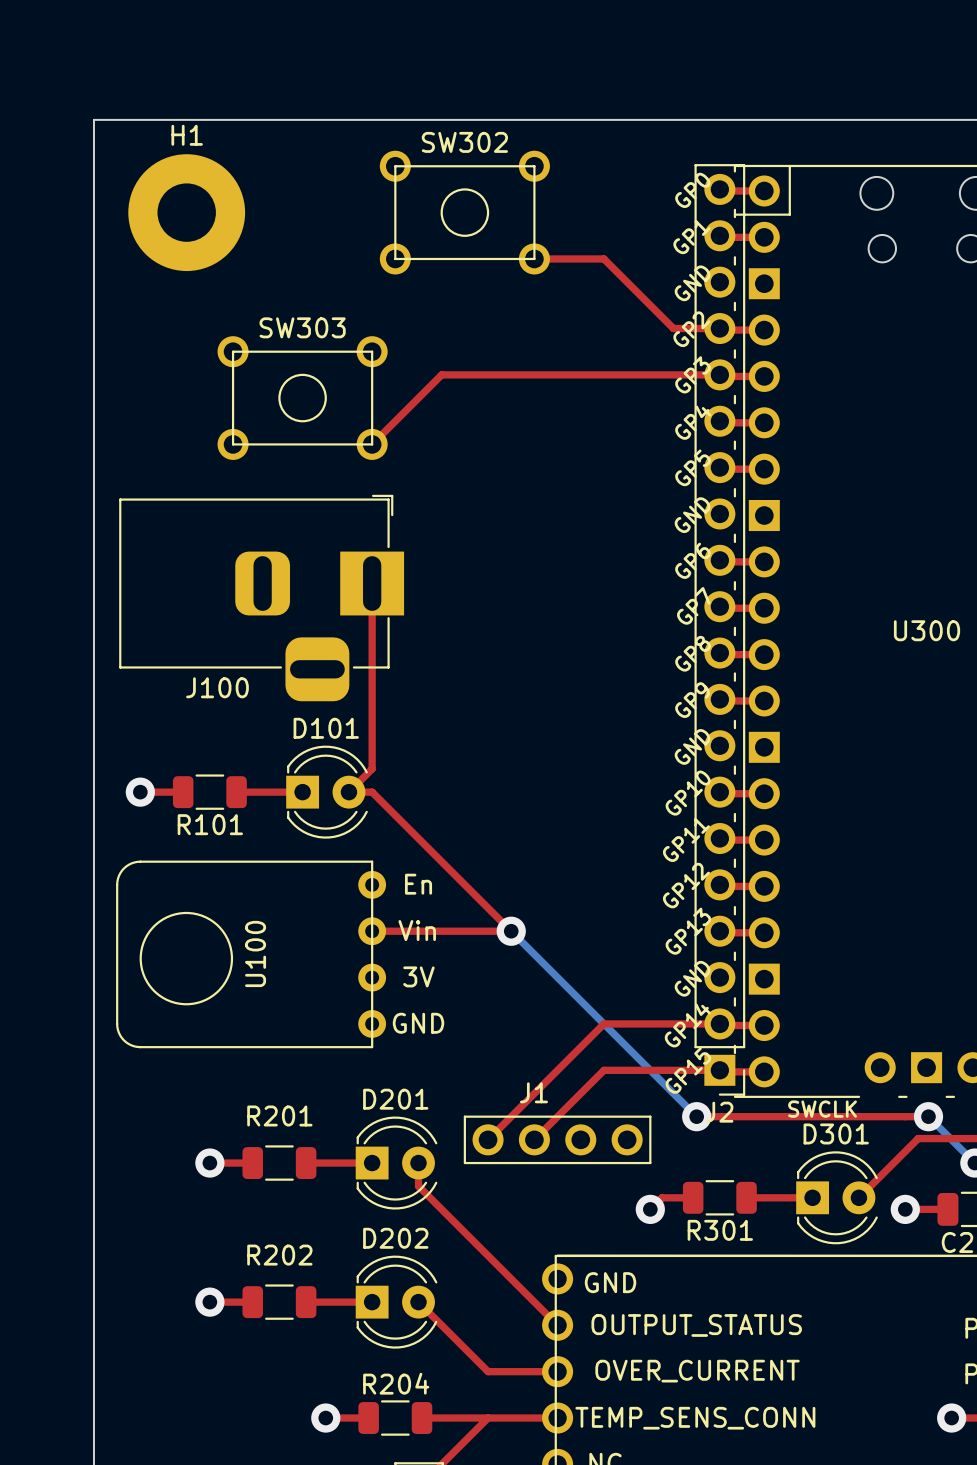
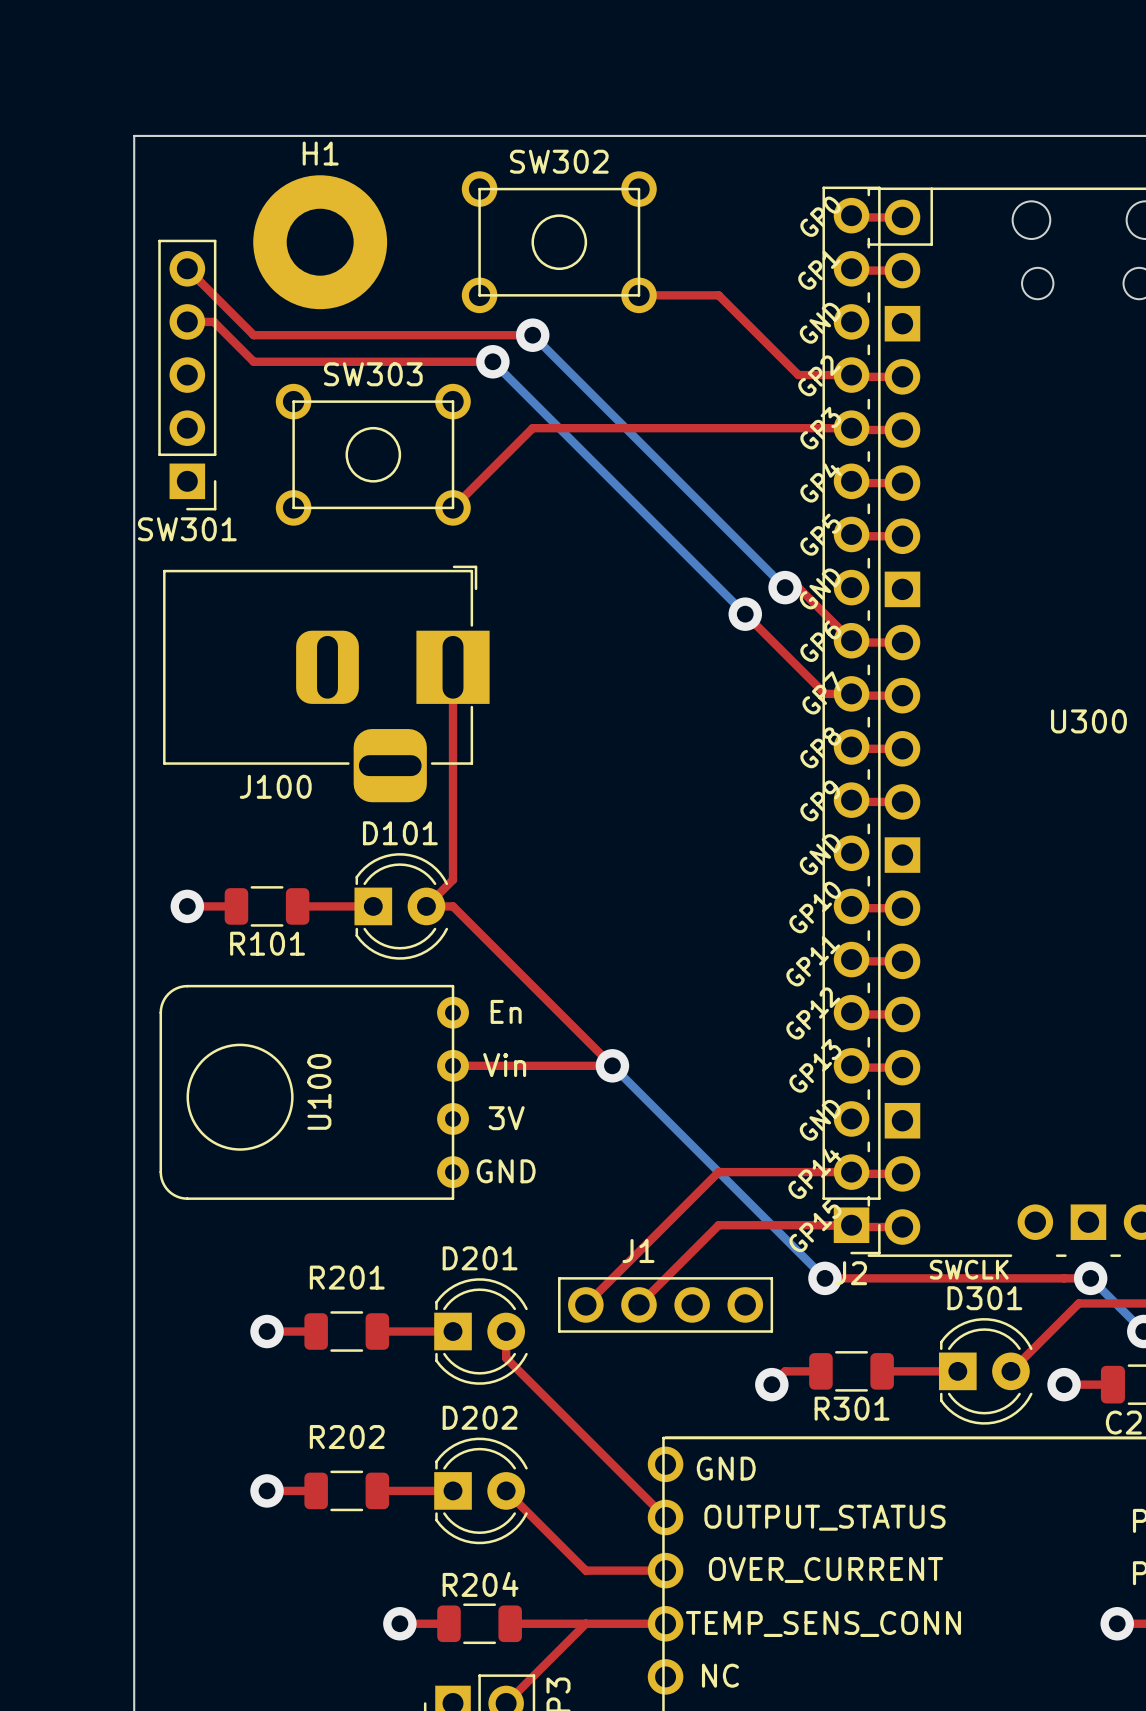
H1 position: (186, 212) -> (320, 242)
top track: none -> (187, 268) (253, 335) (532, 335)
top track: none -> (187, 321) (213, 321) (253, 361) (492, 361)
bottom track: none -> (532, 335) (785, 587)
via: none -> (532, 335)
bottom track: none -> (492, 361) (745, 614)
via: none -> (492, 361)
SW301: none -> (187, 375)
top track: none -> (785, 587) (798, 587) (851, 640)
via: none -> (785, 587)
top track: none -> (745, 614) (824, 693) (851, 693)
via: none -> (745, 614)

